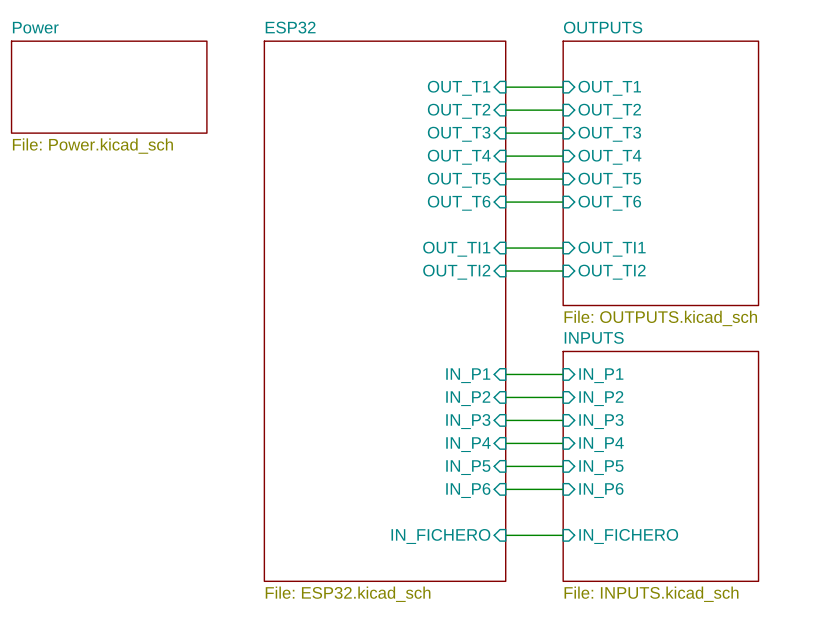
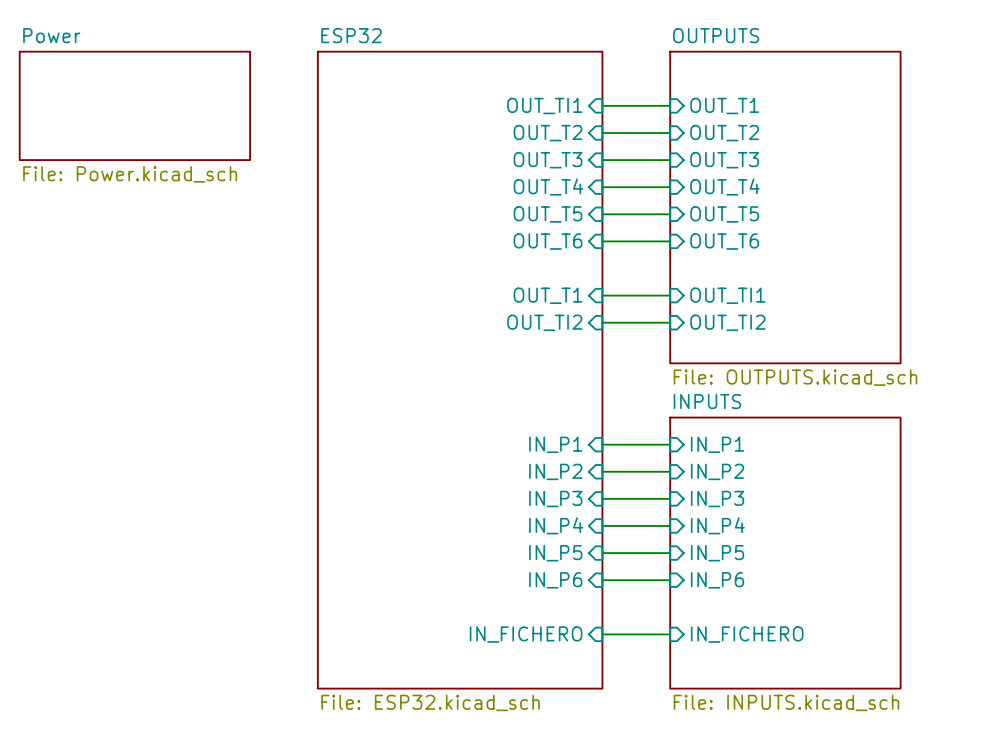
sheet pin: OUT_T1 (459, 88) -> OUT_TI1 (544, 106)
sheet pin: OUT_TI1 (456, 249) -> OUT_T1 (548, 295)

